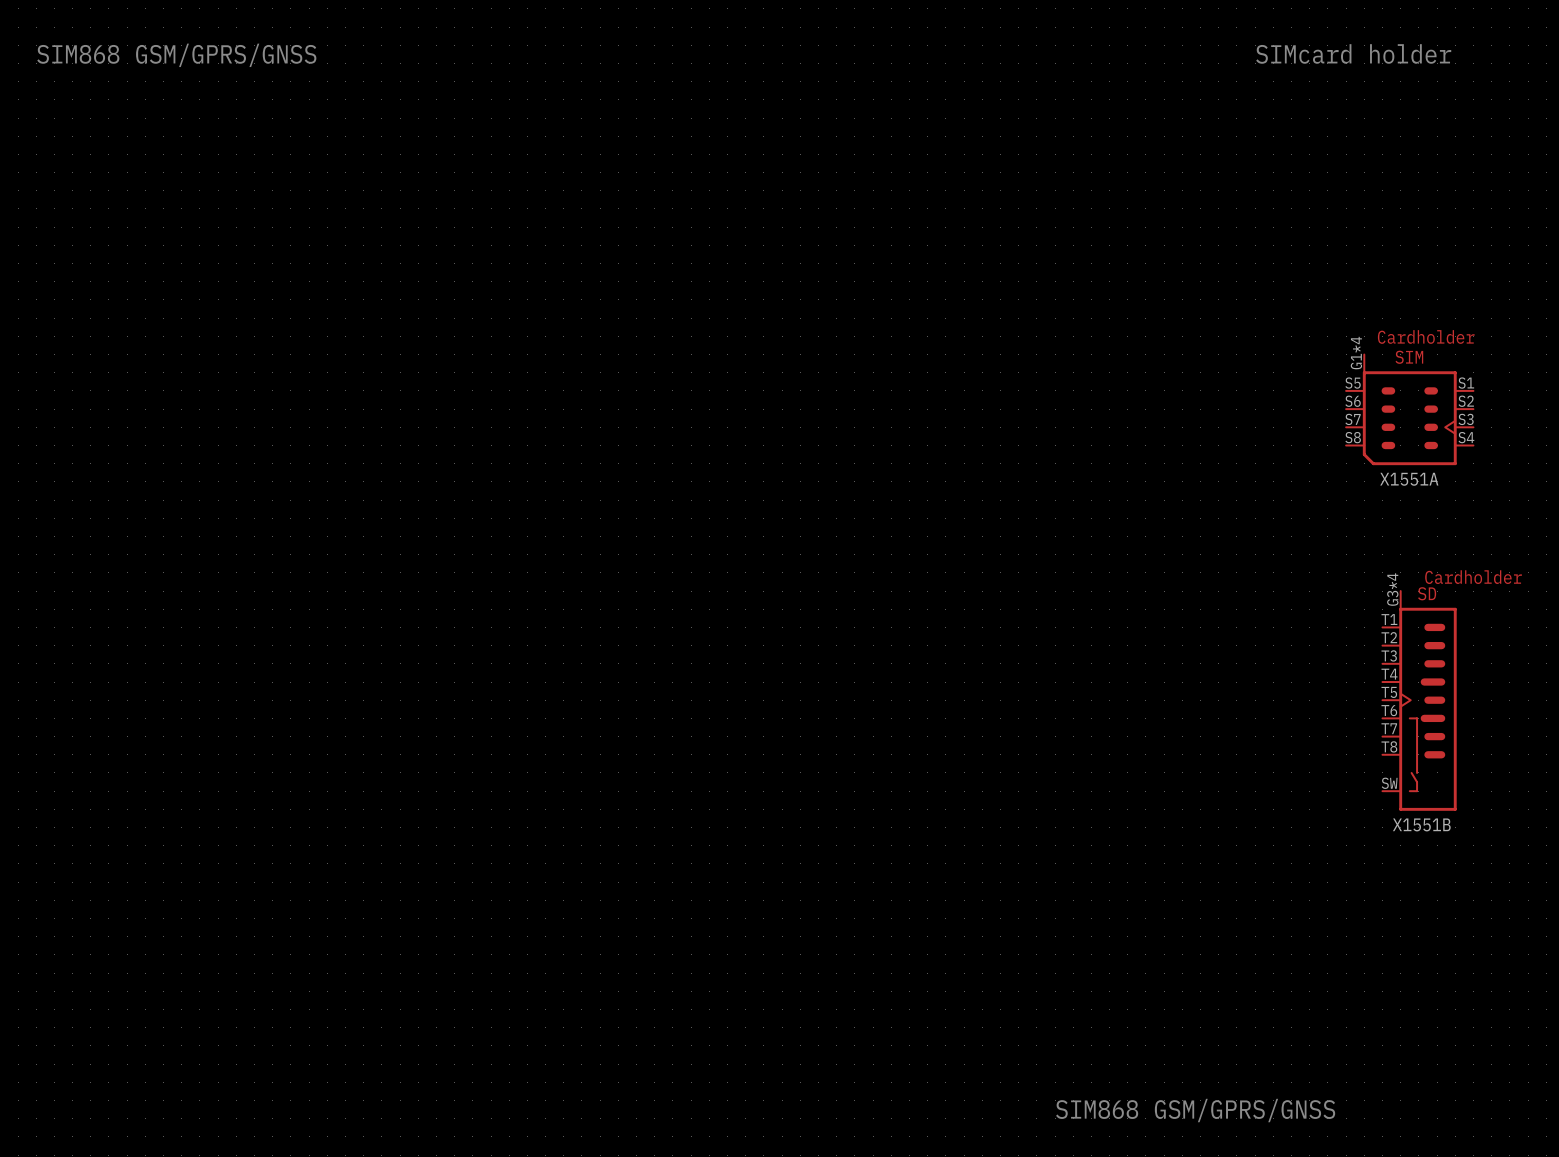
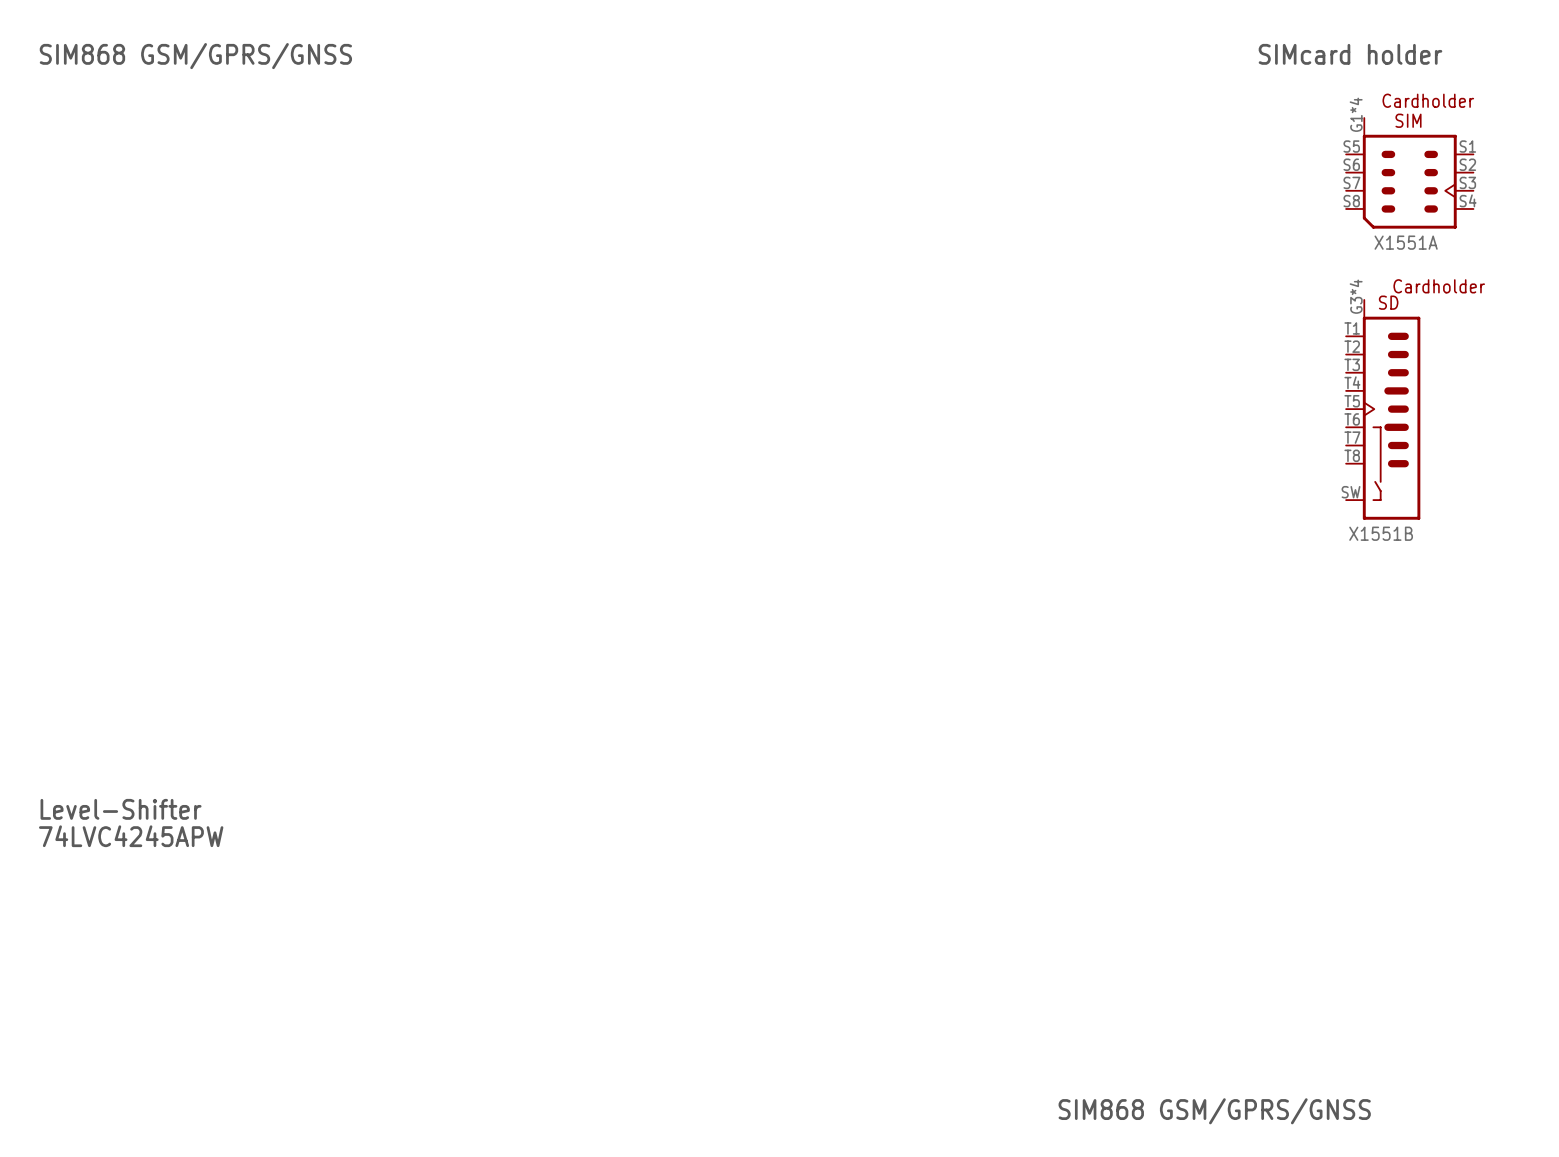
X1551A position: (1409, 409) -> (1409, 173)
X1551B position: (1419, 700) -> (1383, 409)
text: none -> Level-Shifter (121, 809)
text: none -> 74LVC4245APW (131, 836)

